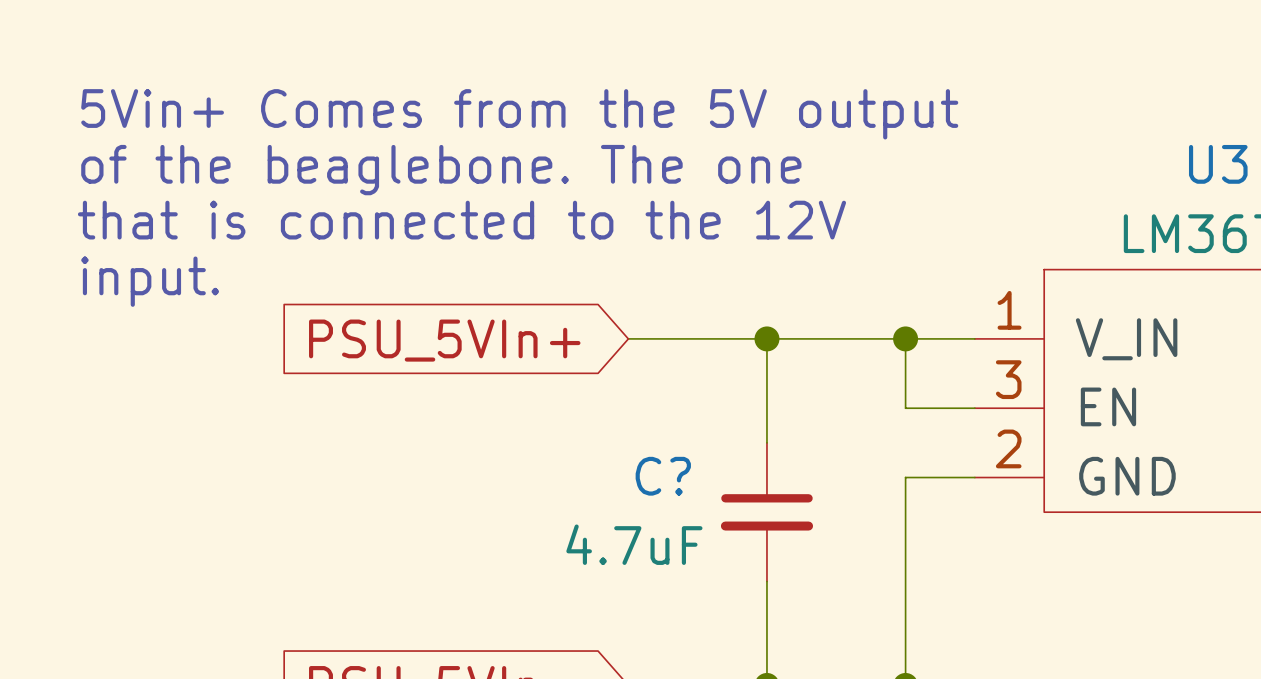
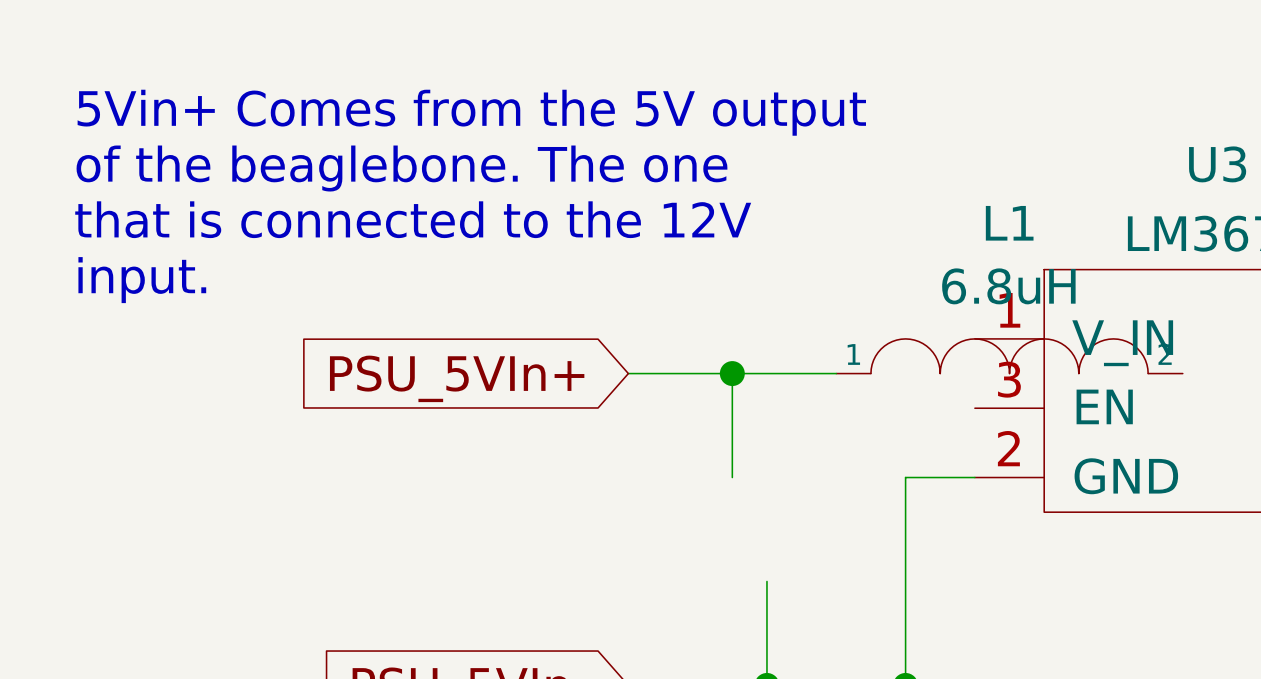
wire: (628, 338) (974, 338) -> none
wire: (766, 338) (766, 442) -> (732, 373) (732, 477)
junction position: (766, 338) -> (732, 373)
wire: (905, 338) (905, 408) (974, 408) -> none
junction: (905, 338) -> none
global label position: PSU_5VIn+ (444, 340) -> PSU_5VIn+ (457, 378)
L1: none -> 6.8uH (1009, 356)
wire: none -> (628, 373) (836, 373)
C?: 4.7uF (766, 512) -> none

